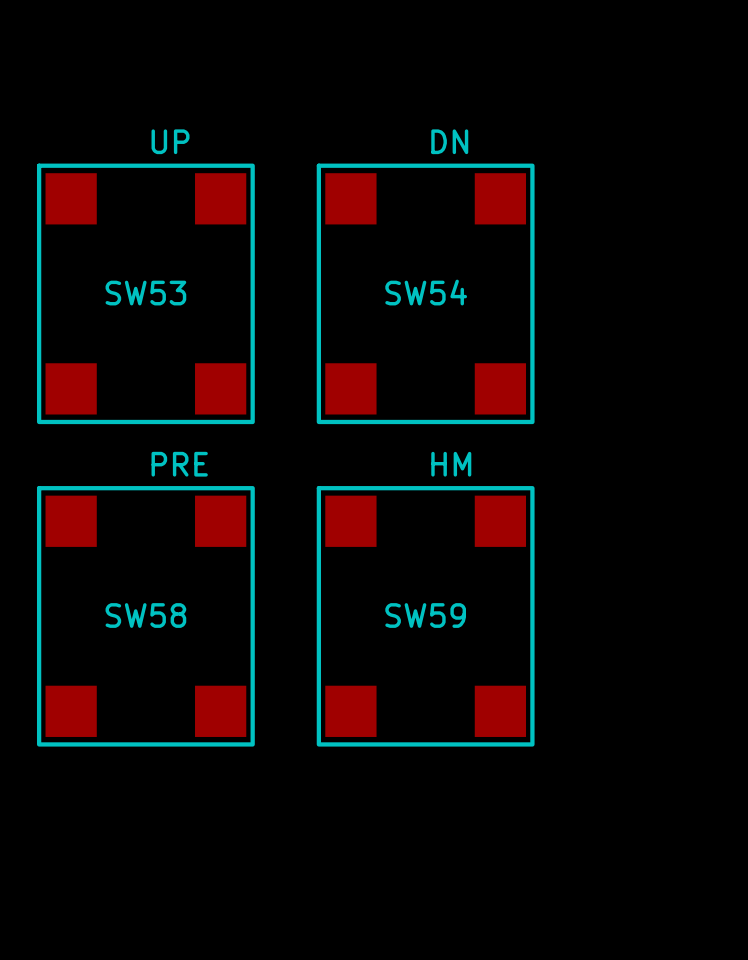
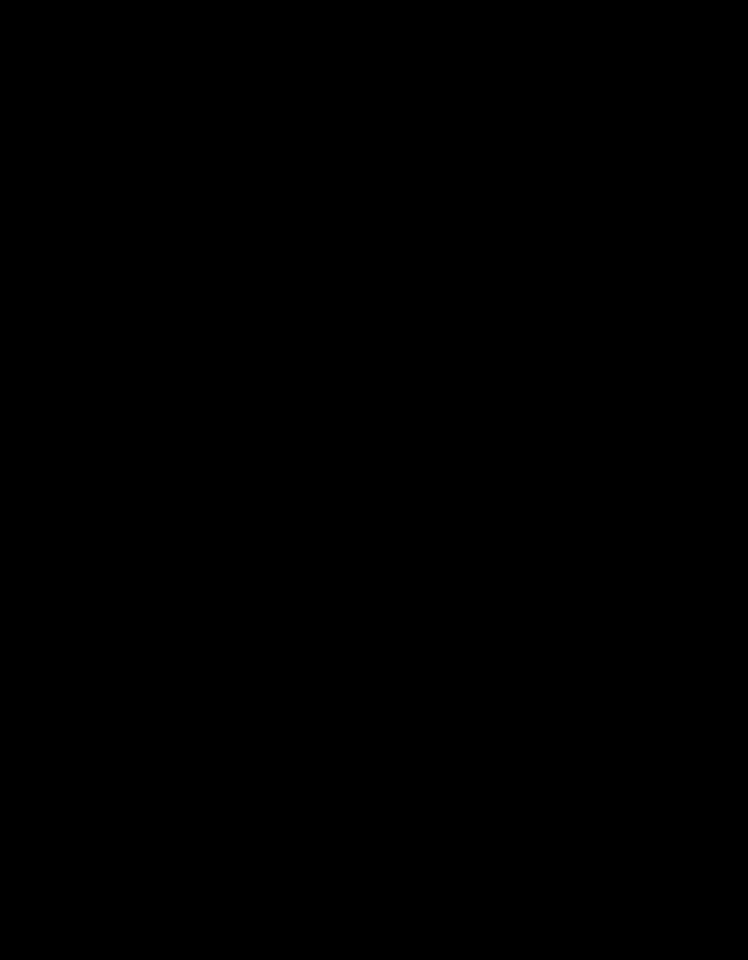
SW53: (145, 293) -> none
SW54: (425, 293) -> none
SW58: (145, 616) -> none
SW59: (425, 616) -> none

